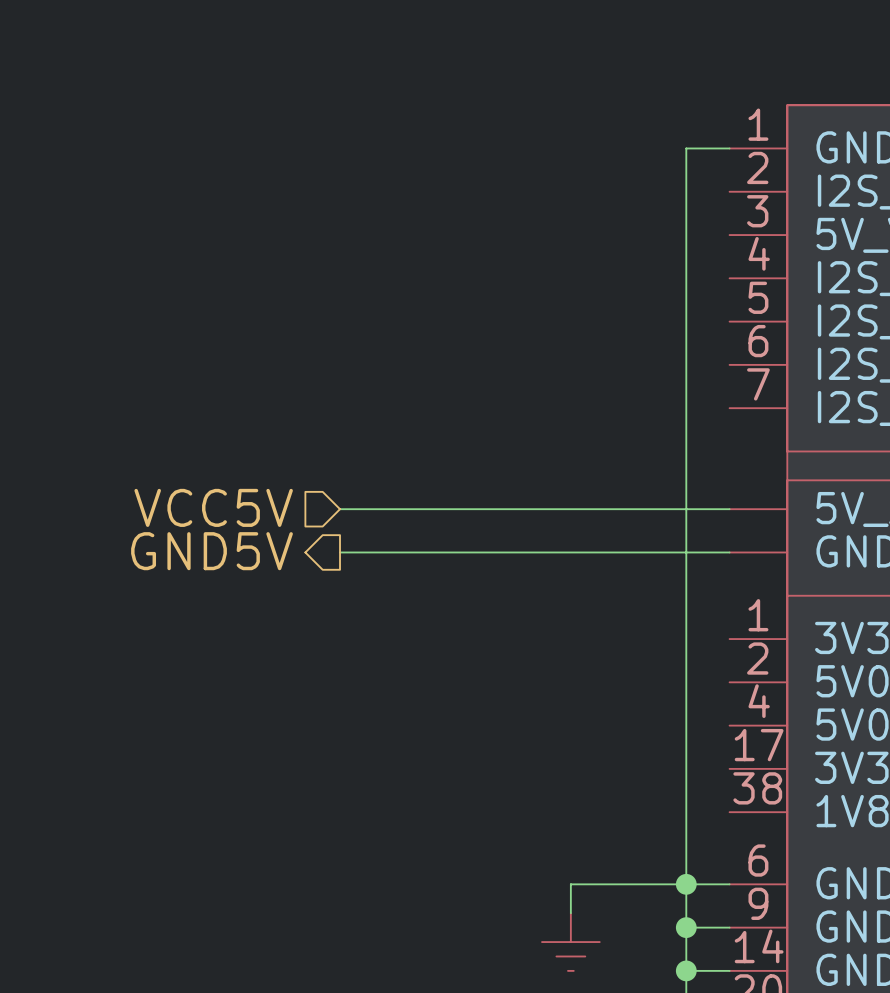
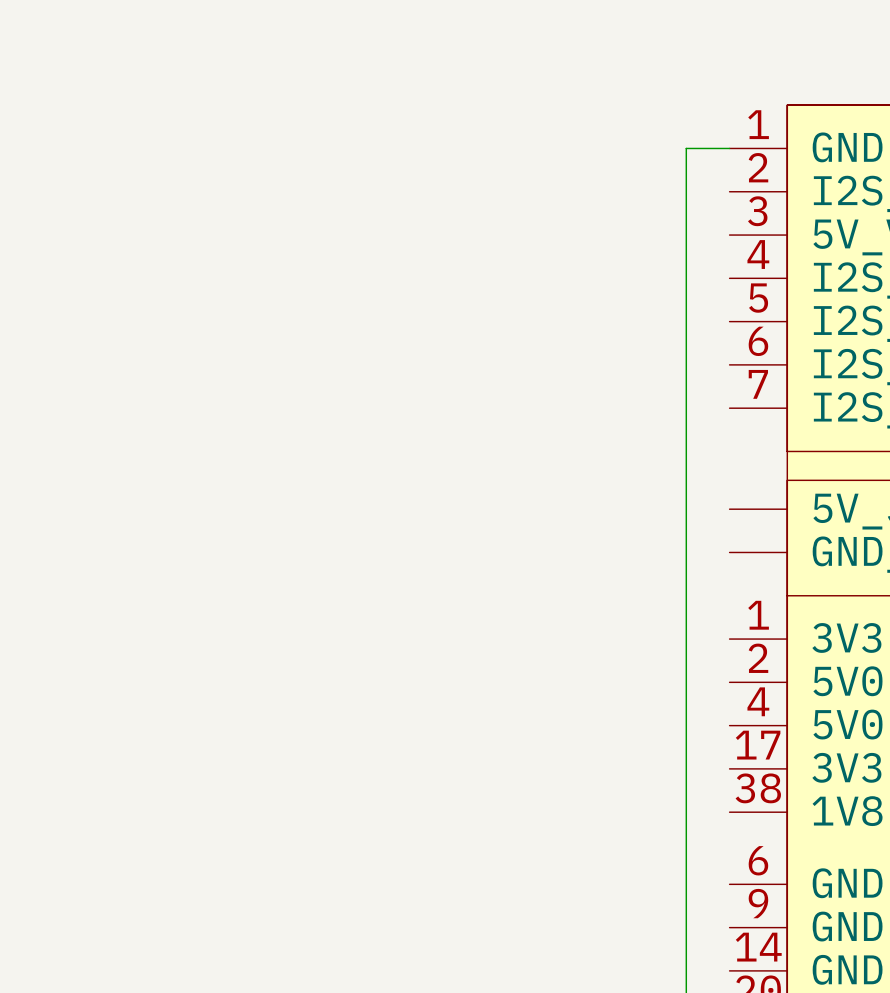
hierarchical label: VCC5V (213, 507) -> none
wire: (340, 509) (729, 509) -> none
hierarchical label: GND5V (211, 551) -> none
wire: (340, 552) (729, 552) -> none
junction: (686, 884) -> none
wire: (729, 884) (570, 884) (570, 913) -> none
wire: (686, 927) (729, 927) -> none
junction: (686, 927) -> none
power symbol: (570, 942) -> none
wire: (686, 970) (729, 970) -> none
junction: (686, 970) -> none

